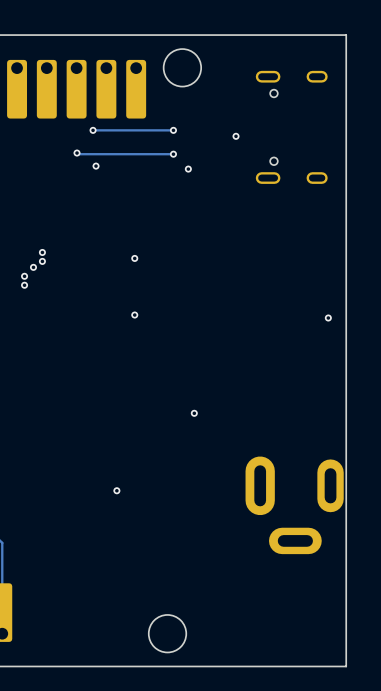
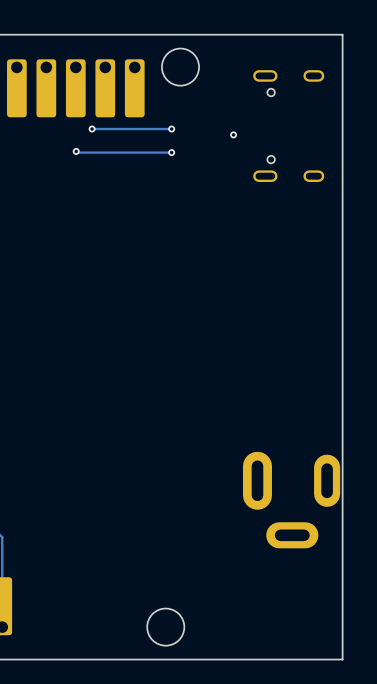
via: (96, 166) -> none
via: (188, 169) -> none
via: (42, 252) -> none
via: (134, 258) -> none
via: (42, 261) -> none
via: (33, 267) -> none
via: (24, 276) -> none
via: (24, 285) -> none
via: (134, 315) -> none
via: (328, 318) -> none
via: (194, 413) -> none
via: (116, 490) -> none

